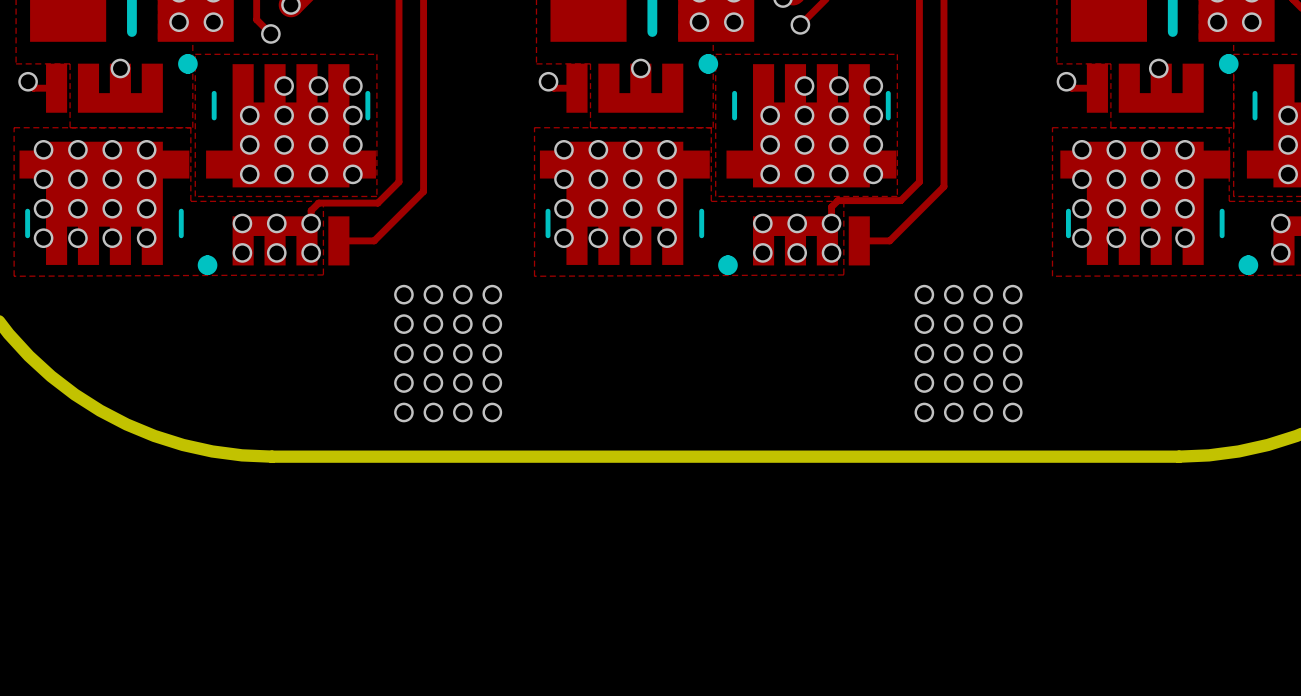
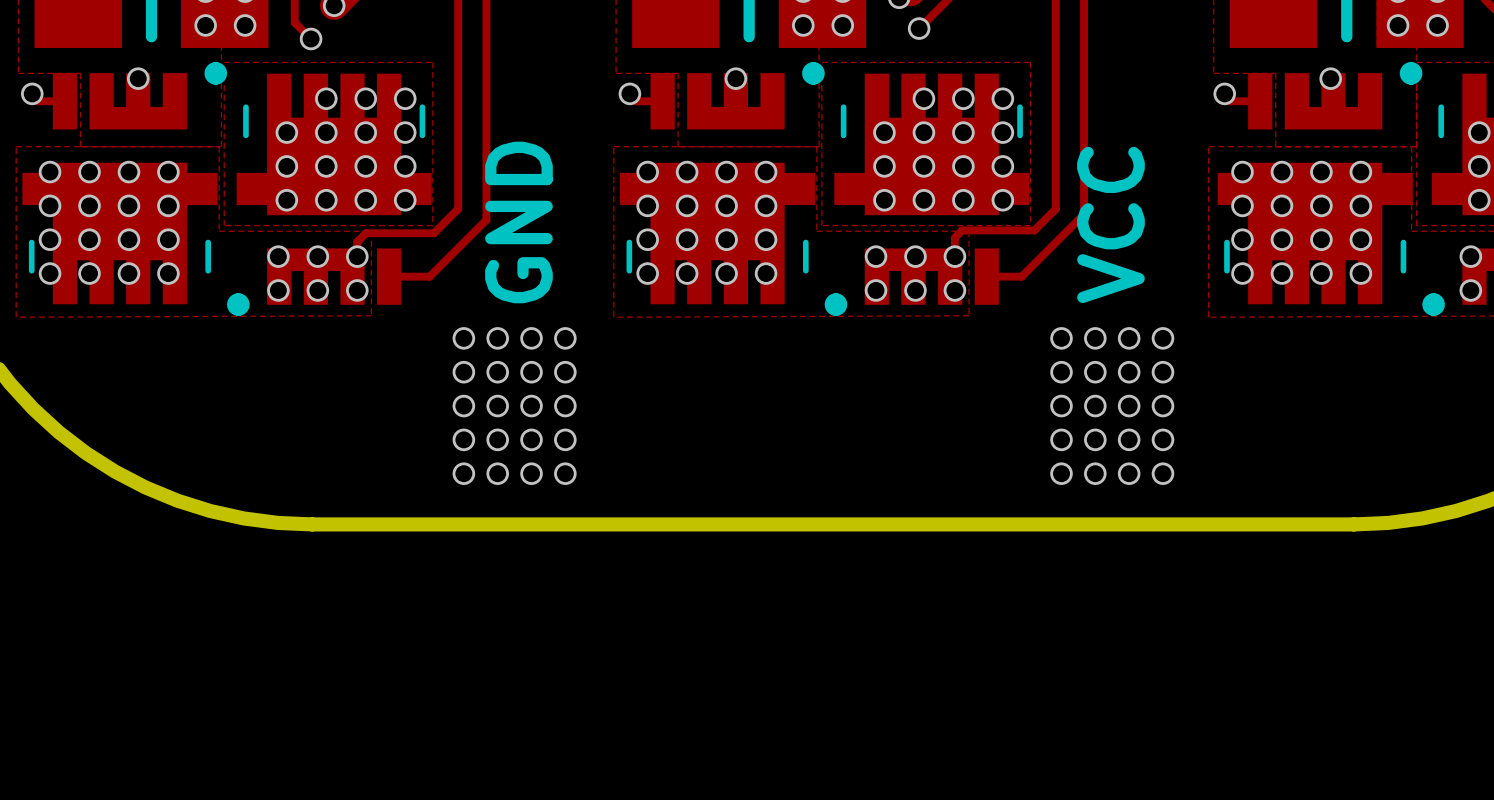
text: none -> GND (518, 222)
text: none -> VCC (1110, 224)

